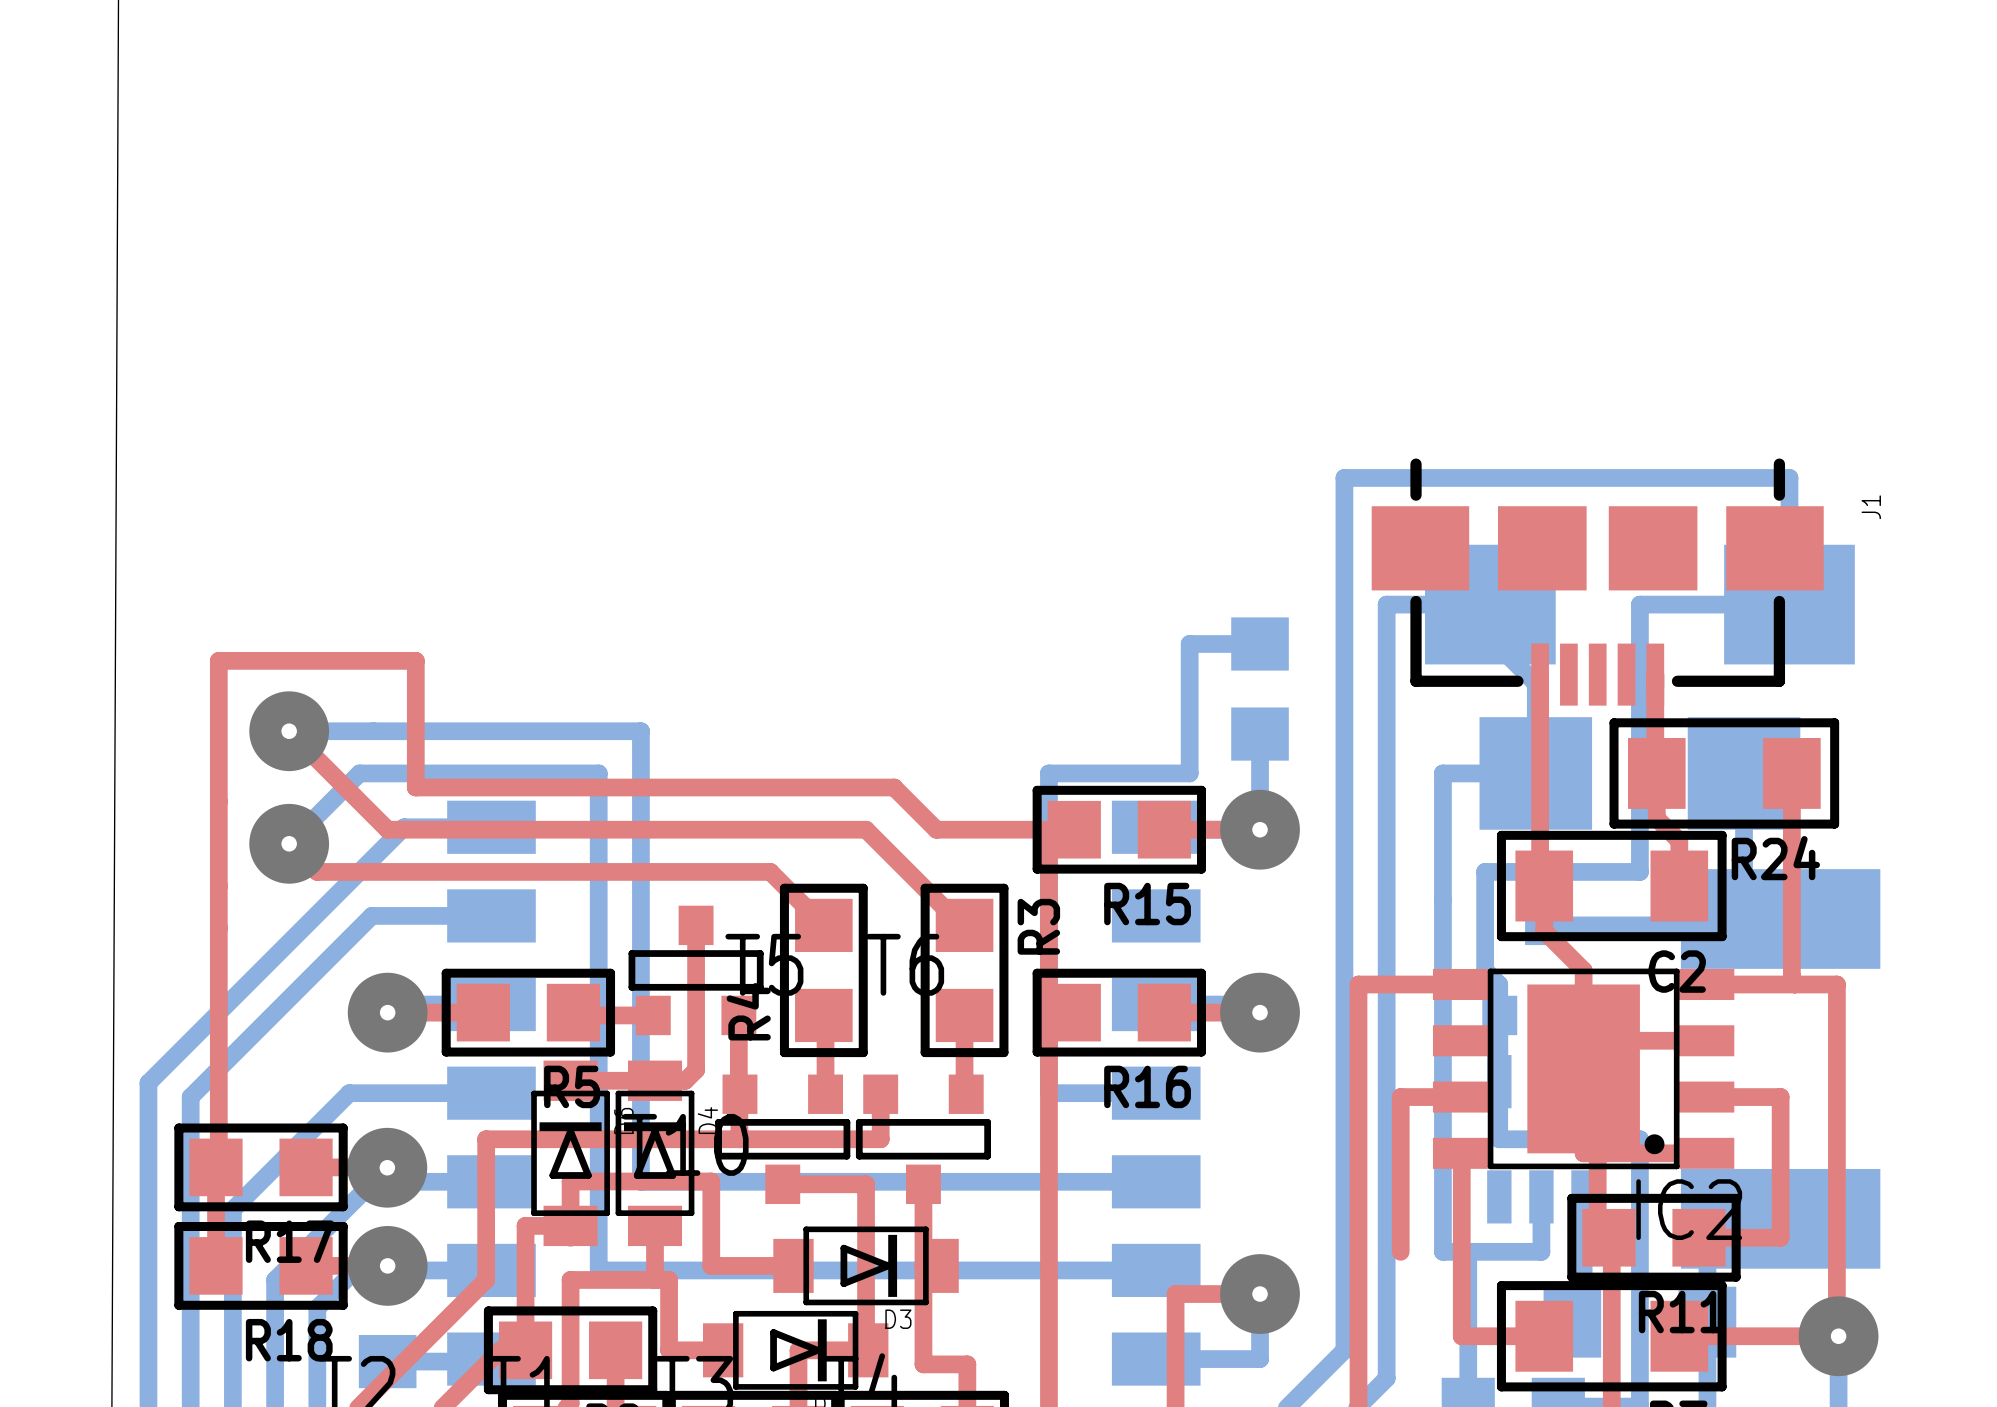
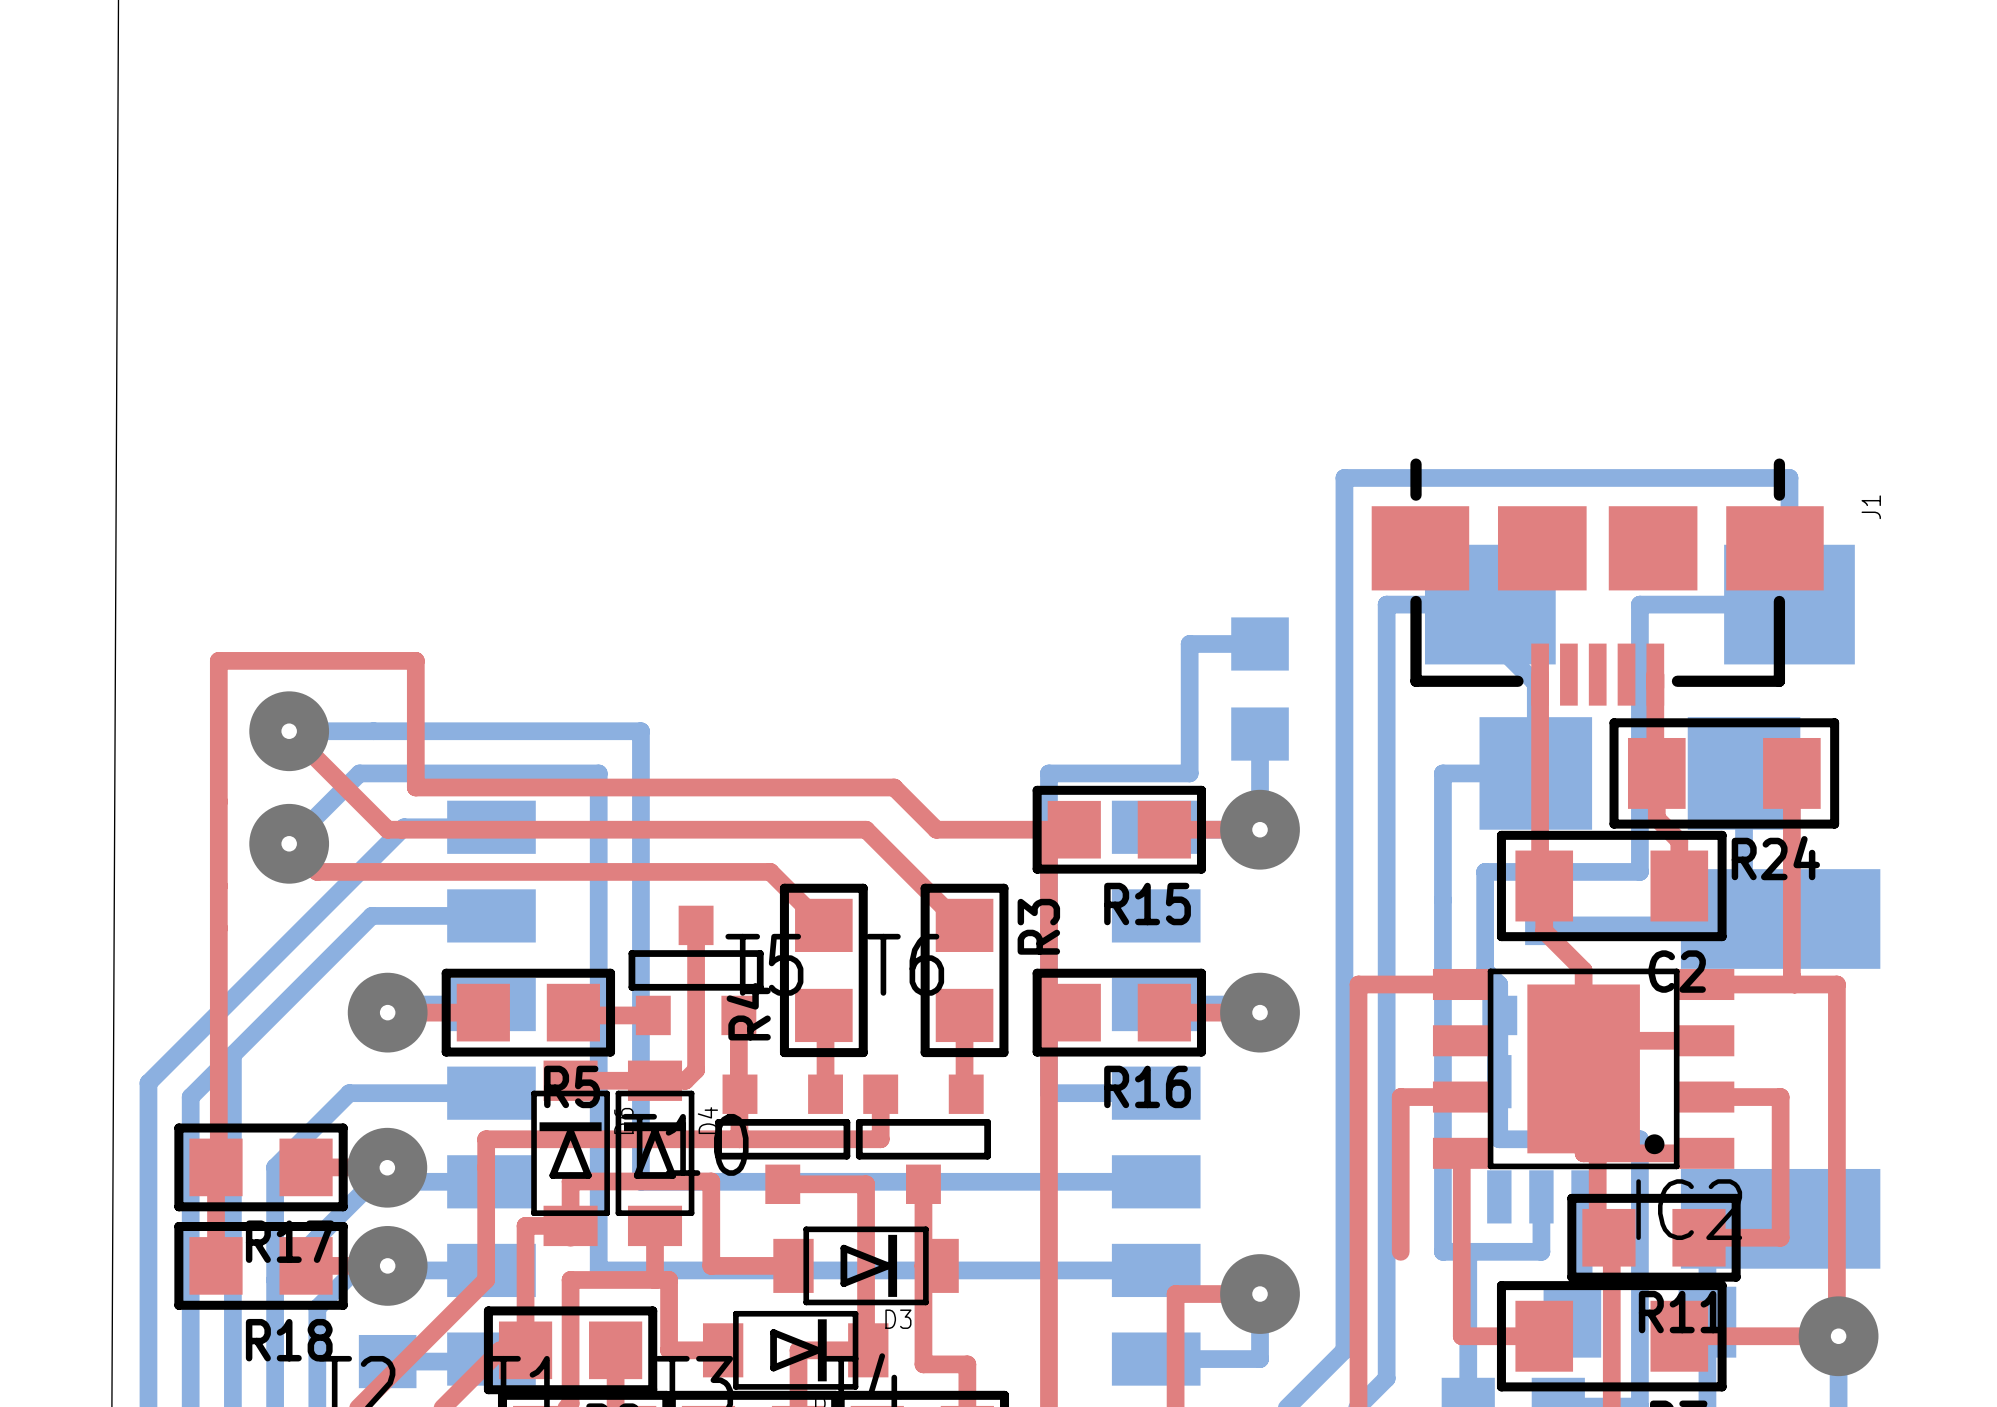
bottom track: none -> (232, 1054) (232, 1209)
bottom track: (275, 1167) (232, 1209) -> (275, 1167) (275, 1279)

